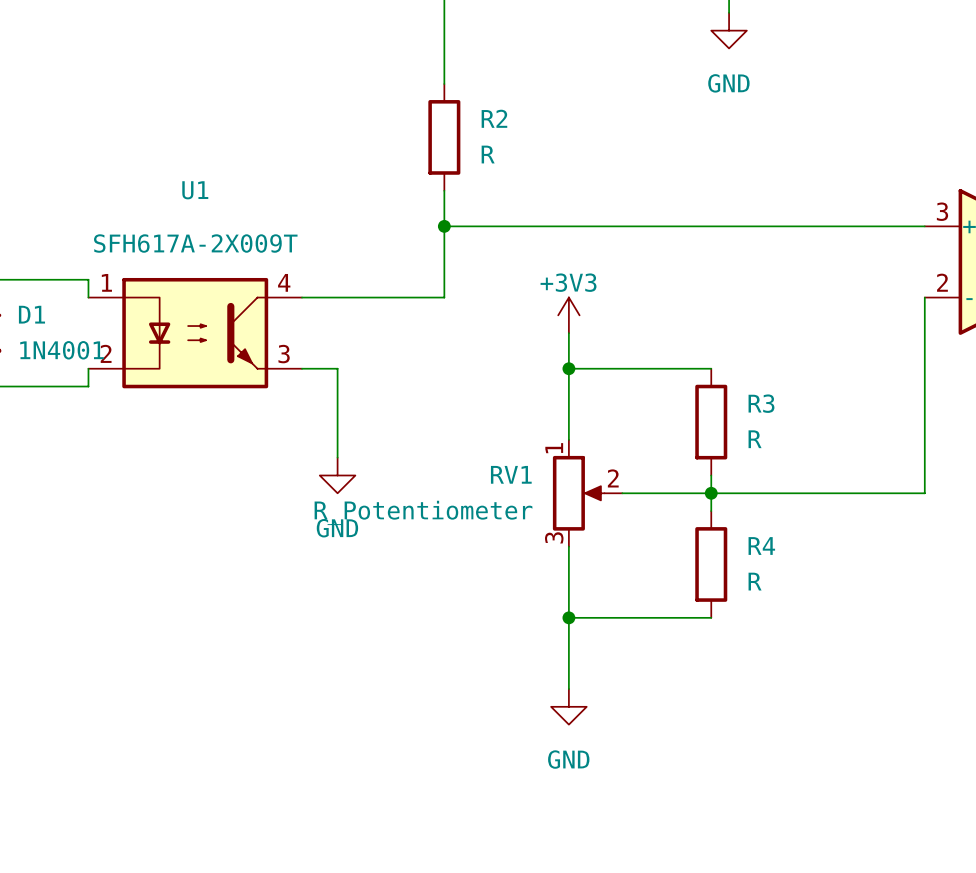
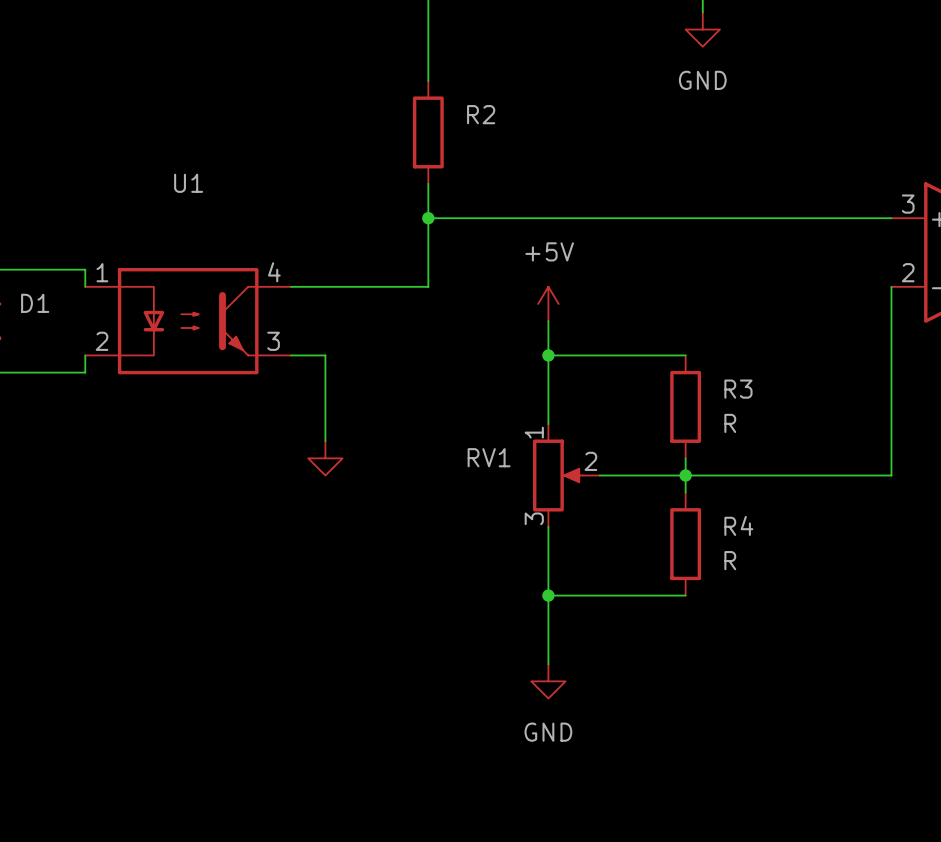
R2 value: R (488, 154) -> none
U1 value: SFH617A-2X009T (195, 243) -> none
power symbol: +3V3 (568, 315) -> +5V (548, 303)
D1 value: 1N4001 (62, 350) -> none
RV1 value: R_Potentiometer (423, 512) -> none
power symbol text: GND (337, 528) -> none

